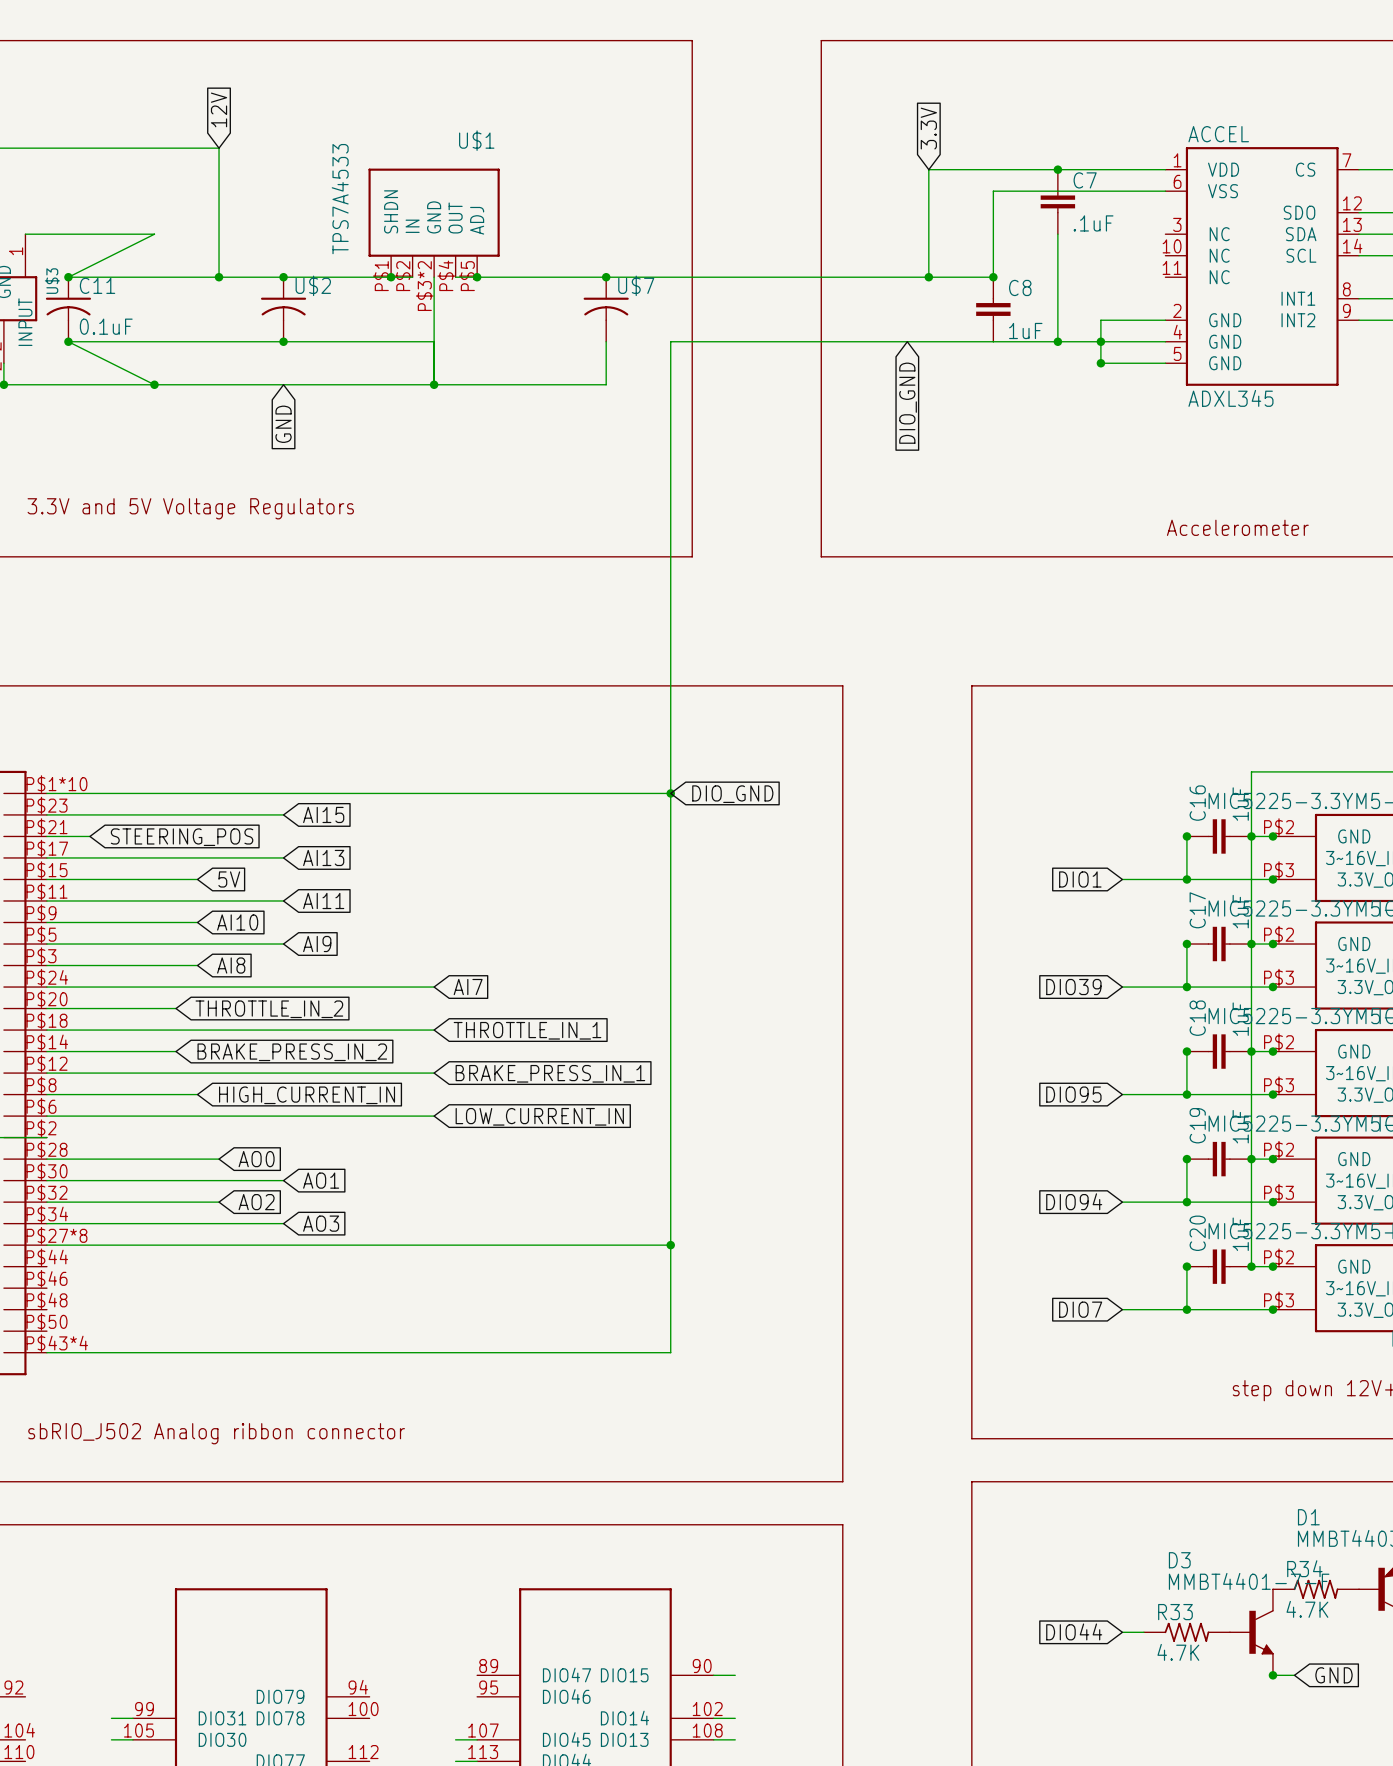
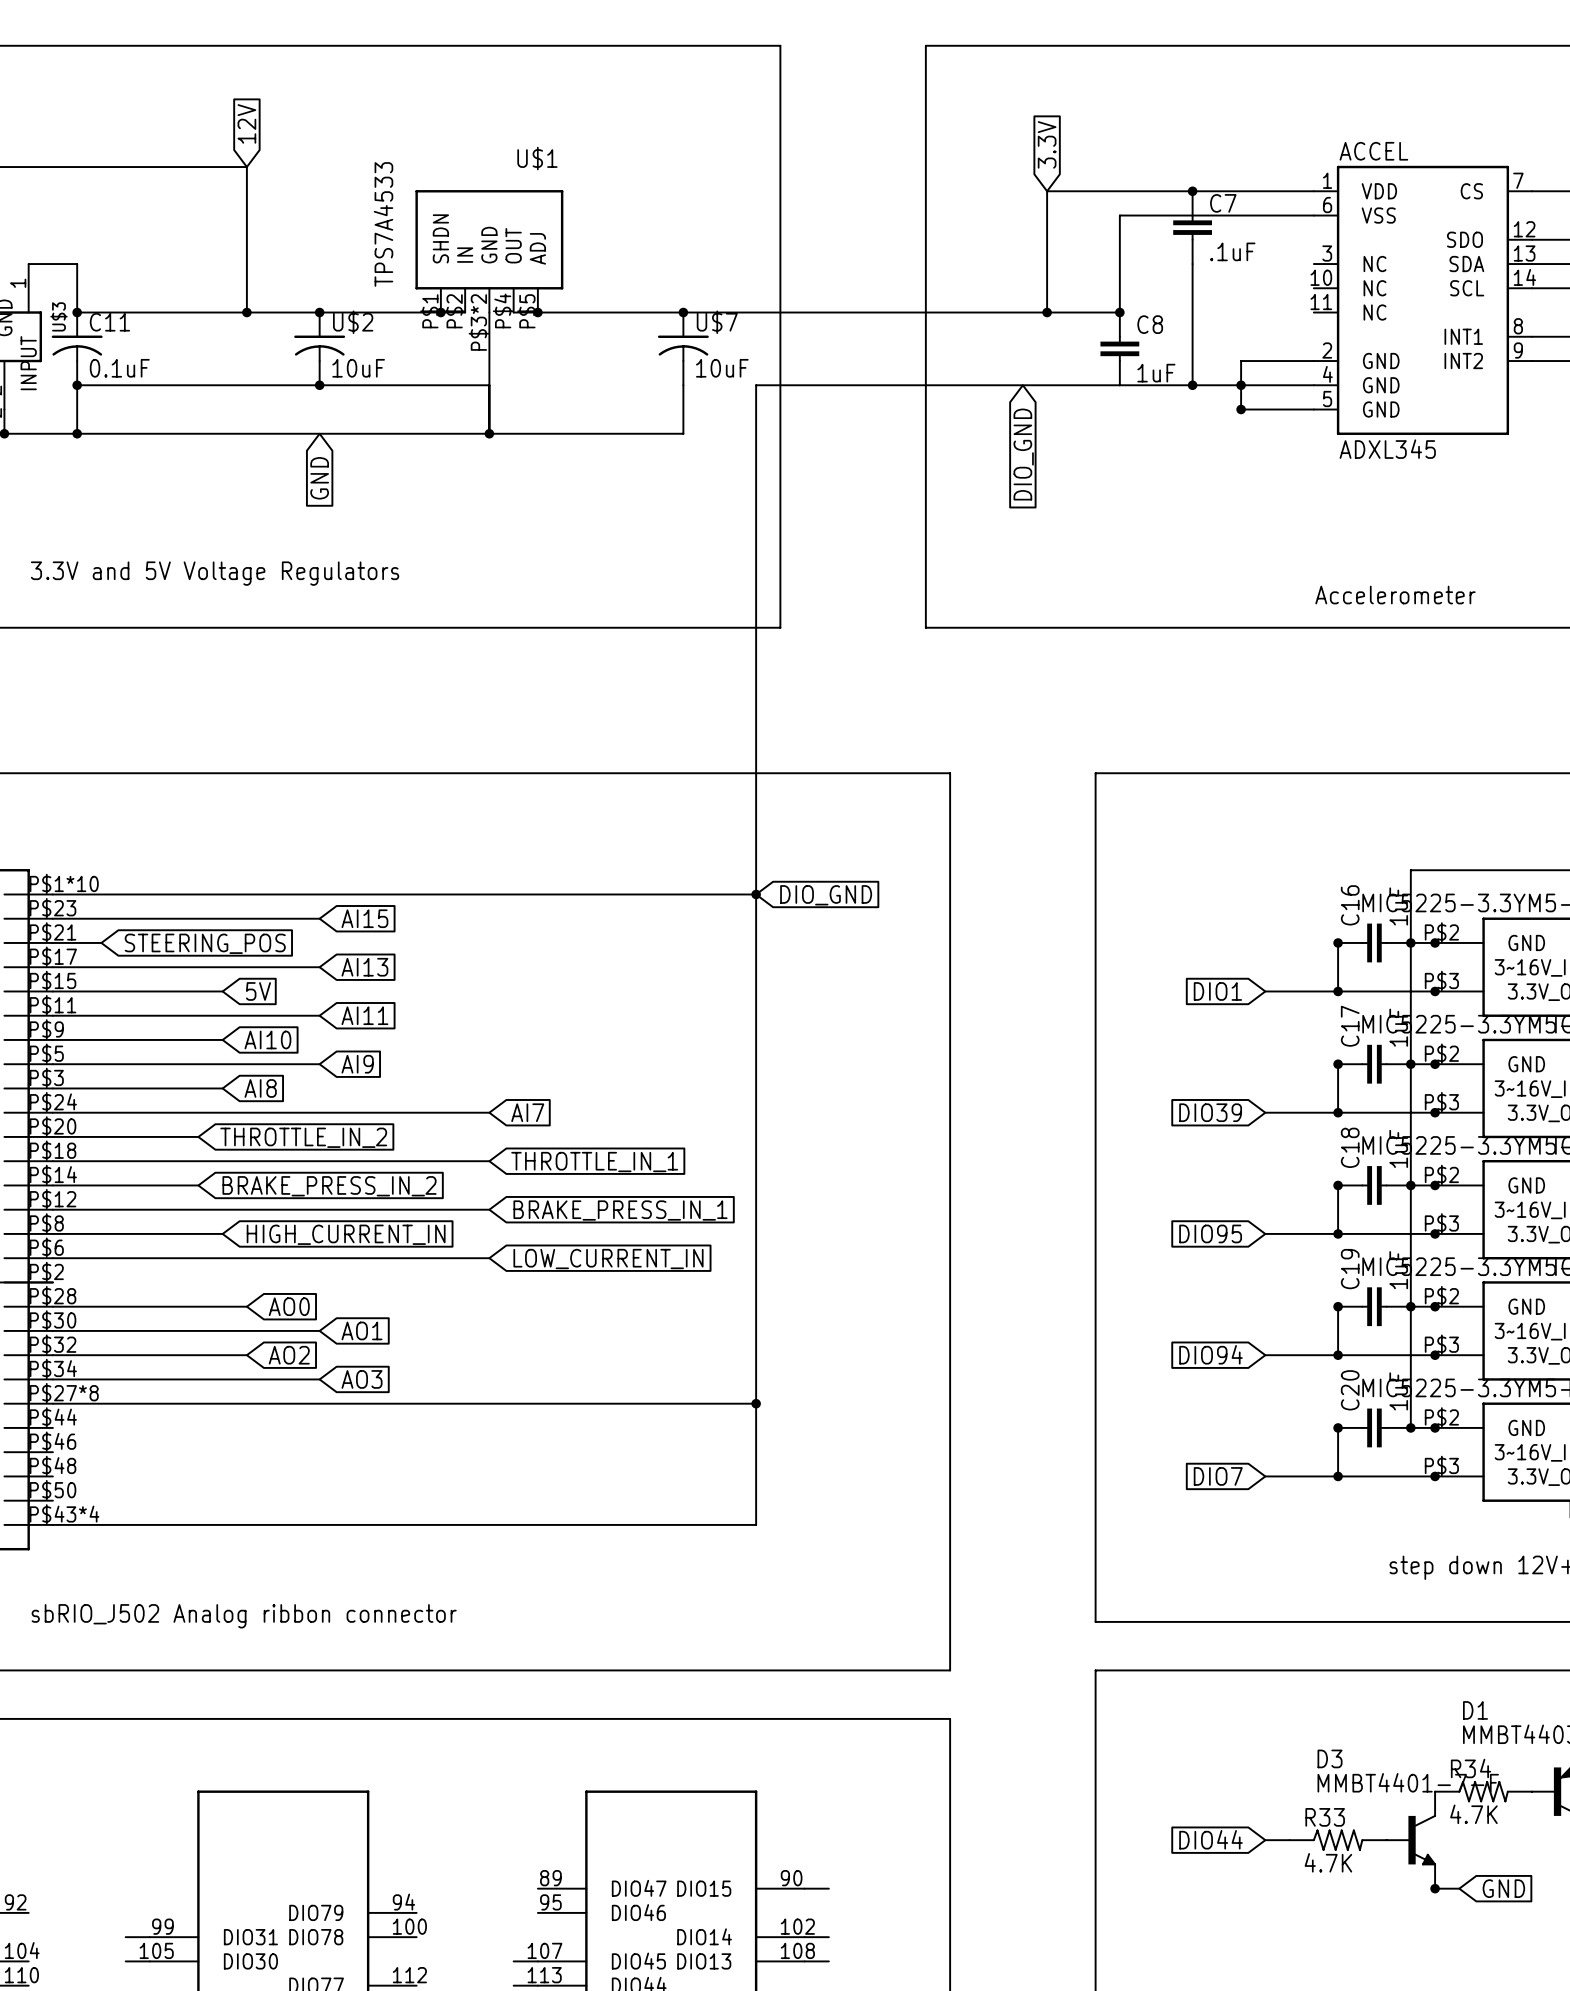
wire: (68, 234) (154, 234) (68, 277) -> (77, 264) (77, 312)
U$2 value: none -> 10uF (358, 368)
U$7 value: none -> 10uF (722, 368)
wire: (68, 341) (154, 384) -> (77, 385) (77, 433)
junction: none -> (77, 433)
junction: (154, 384) -> none

